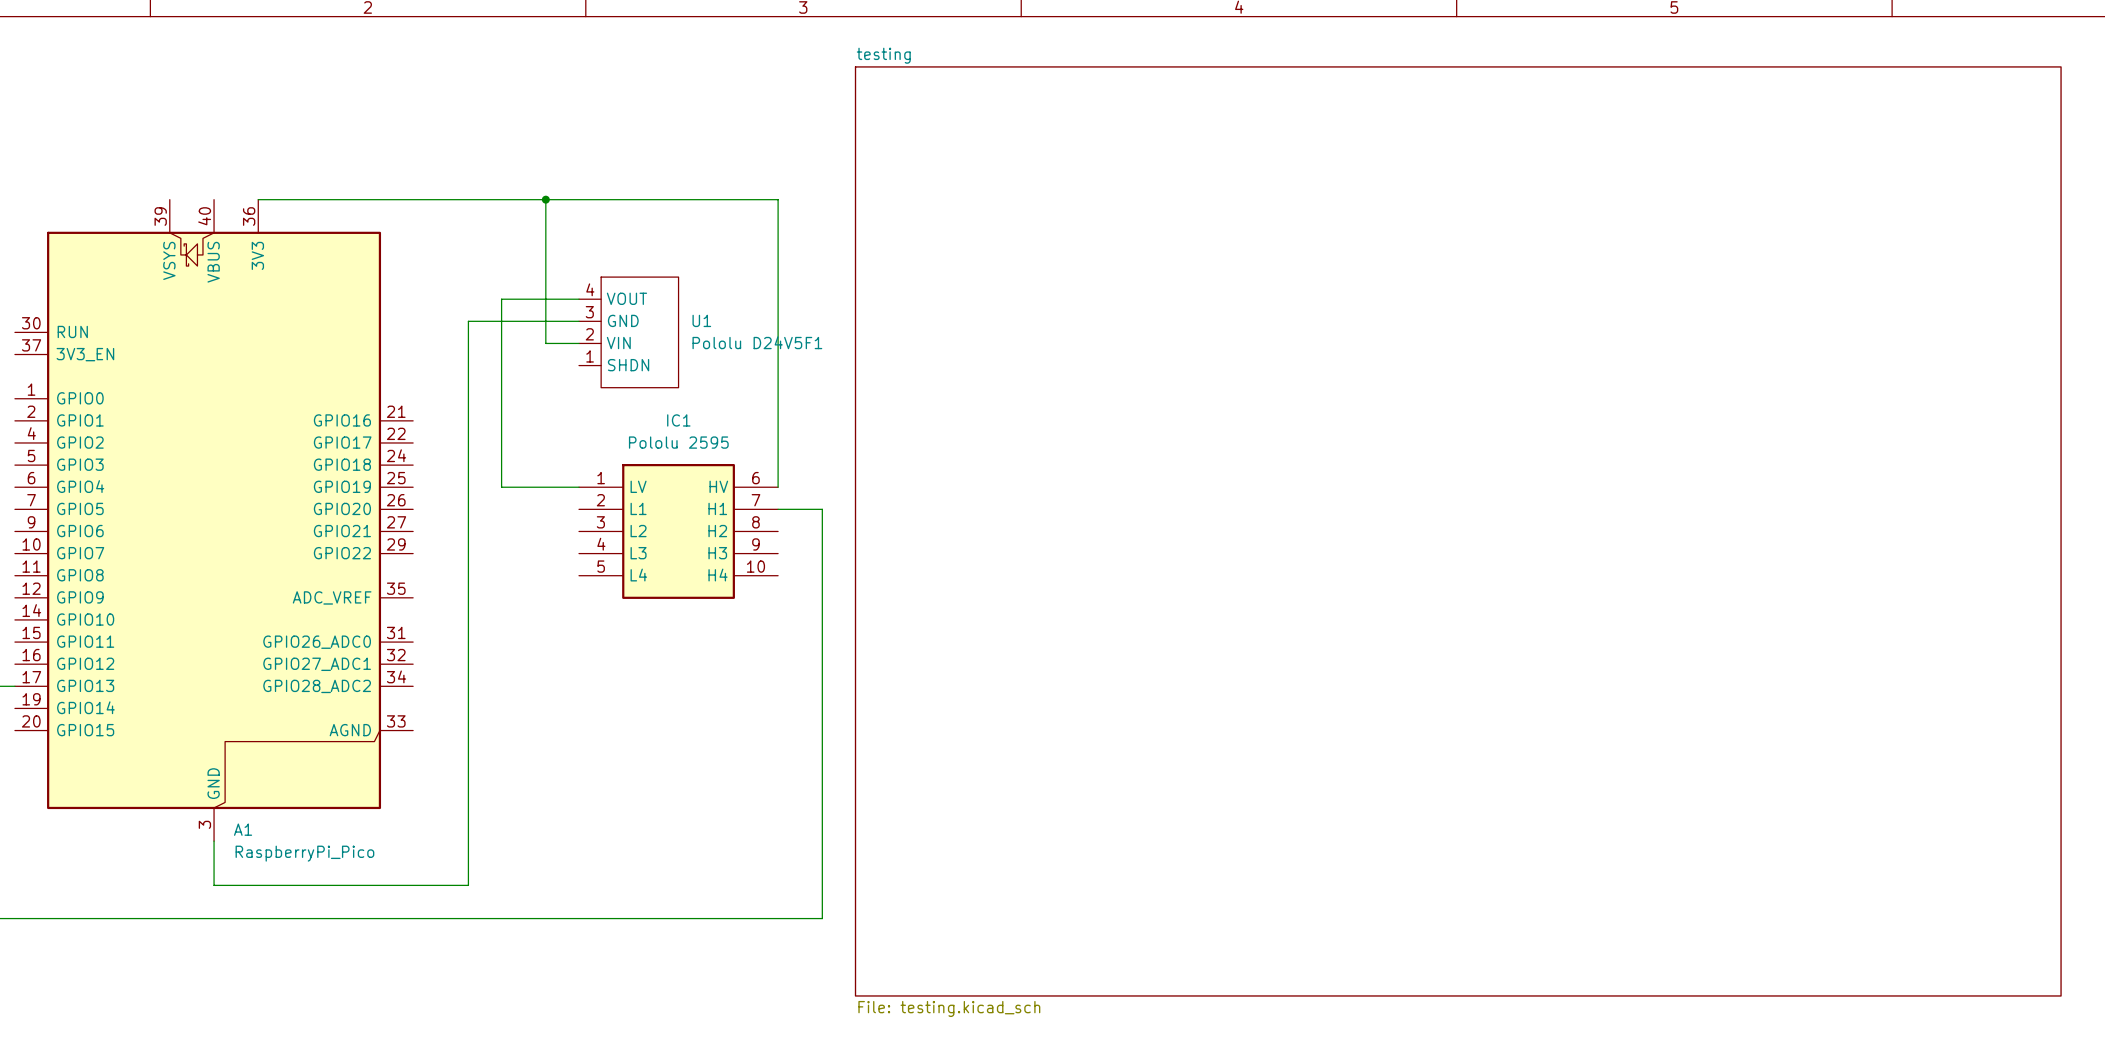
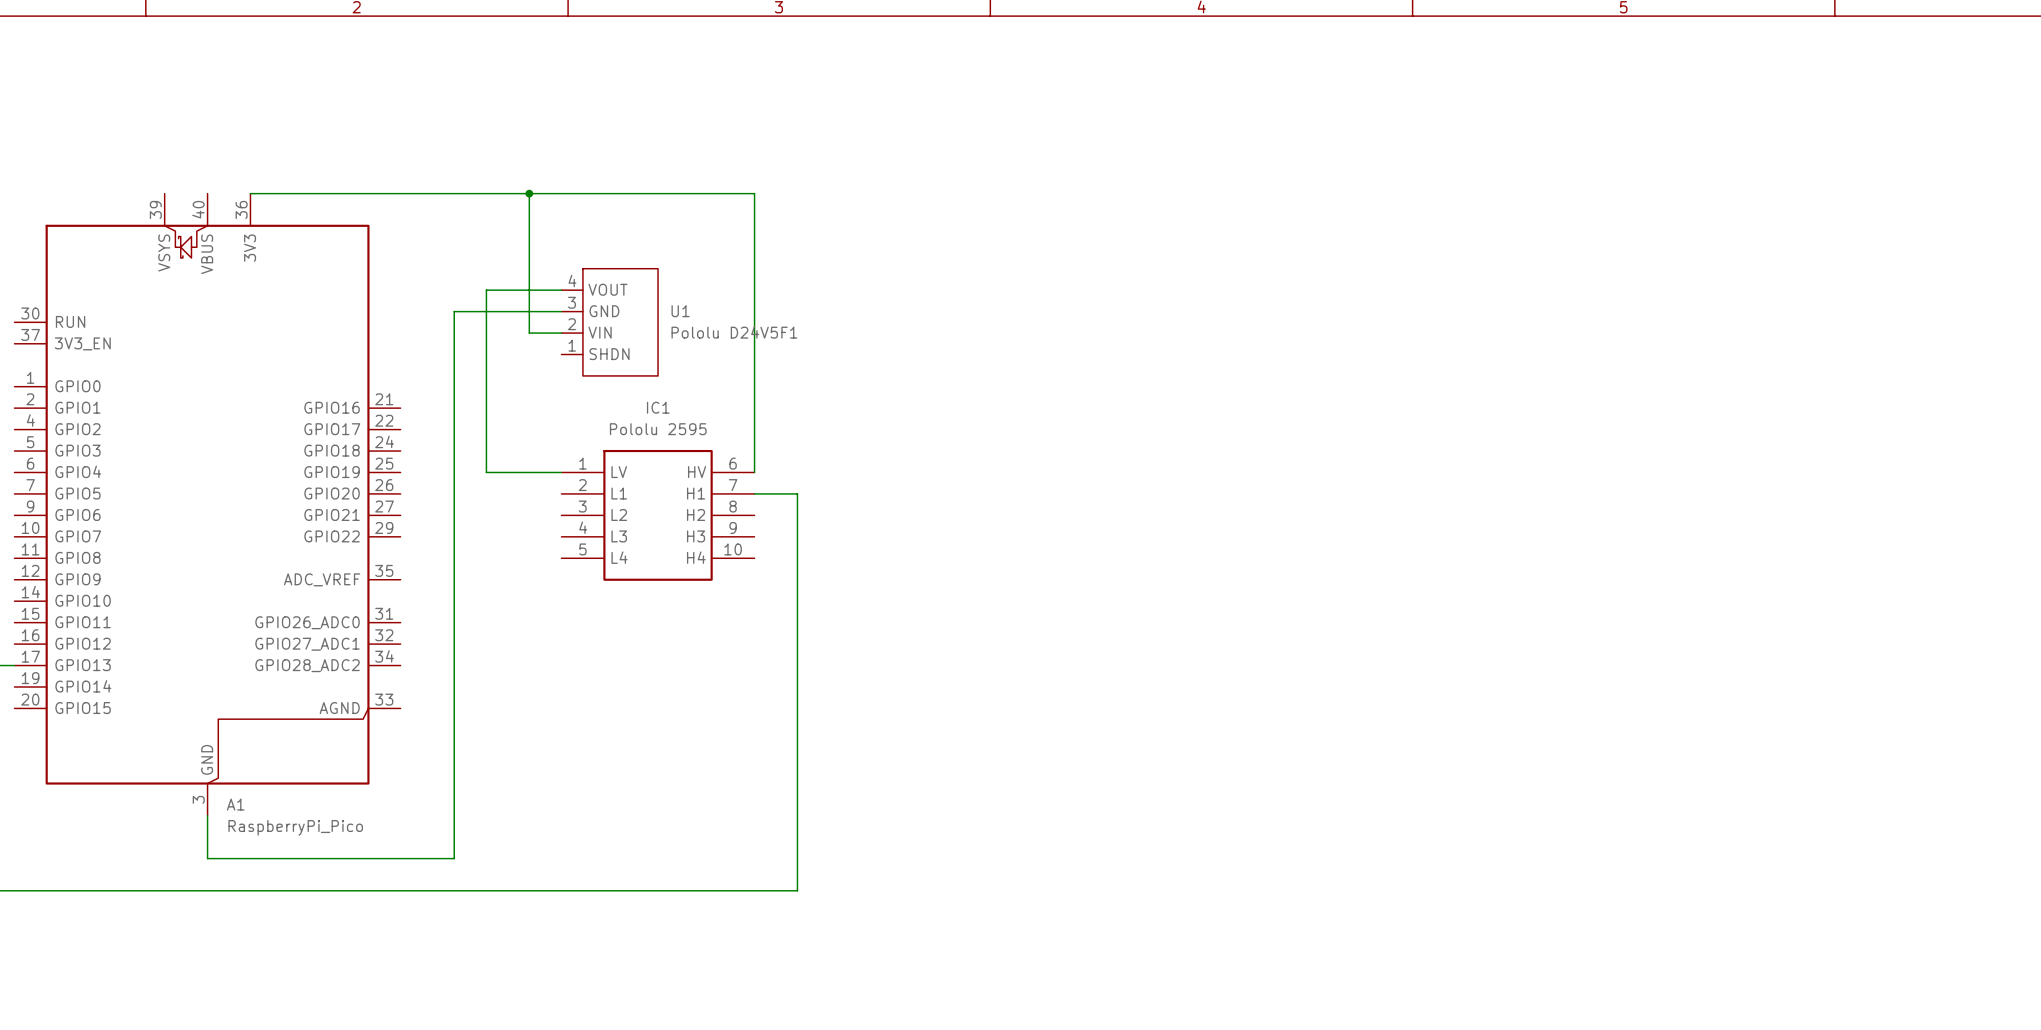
sheet testing: File: testing.kicad_sch (1458, 531) -> none

